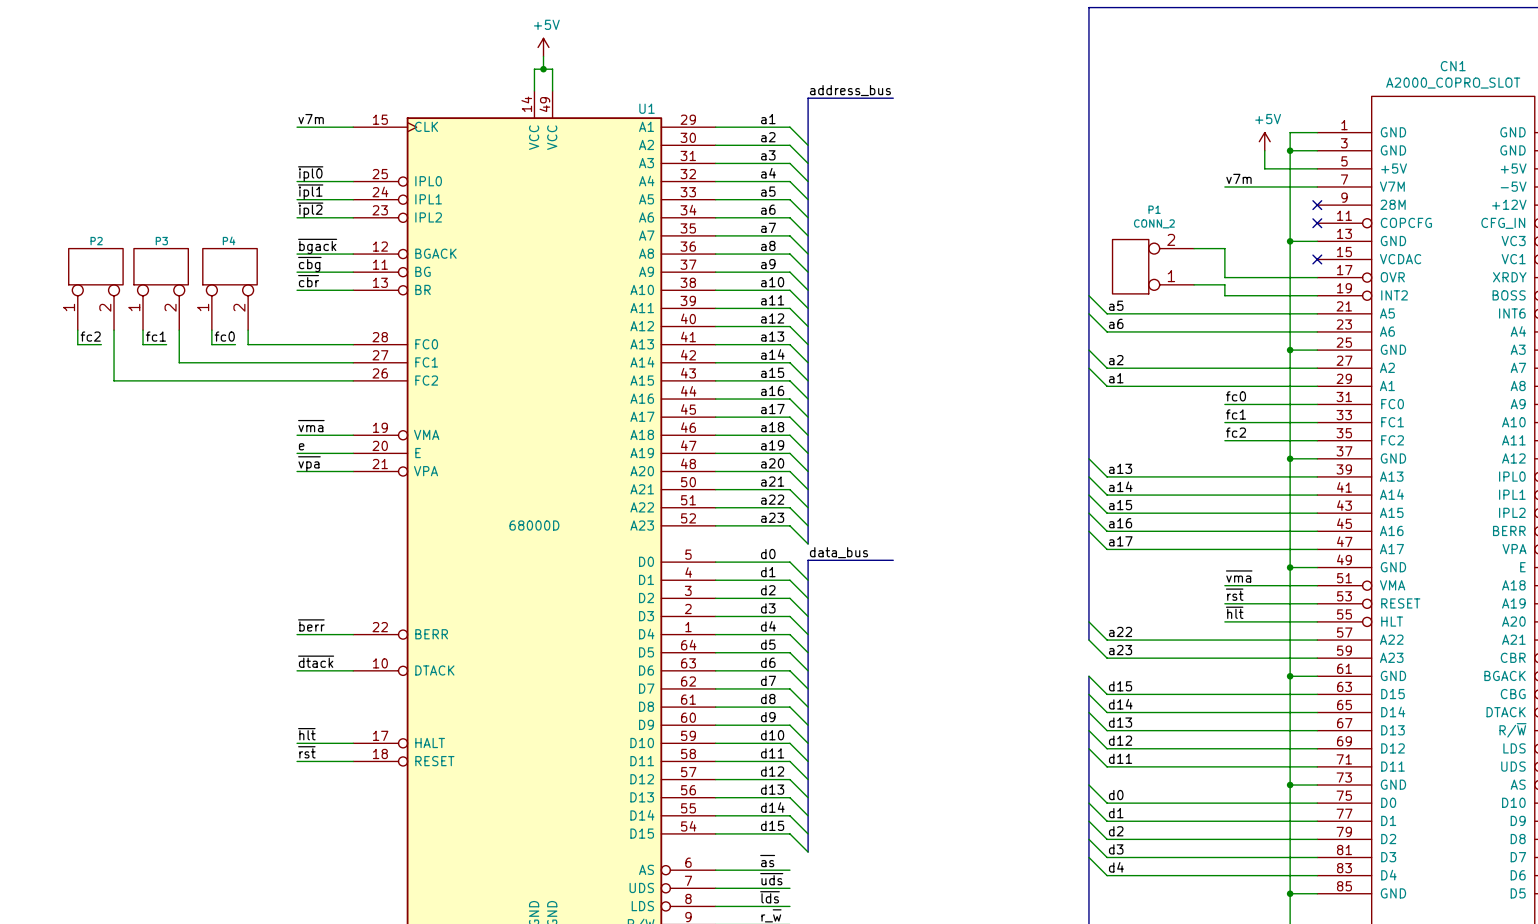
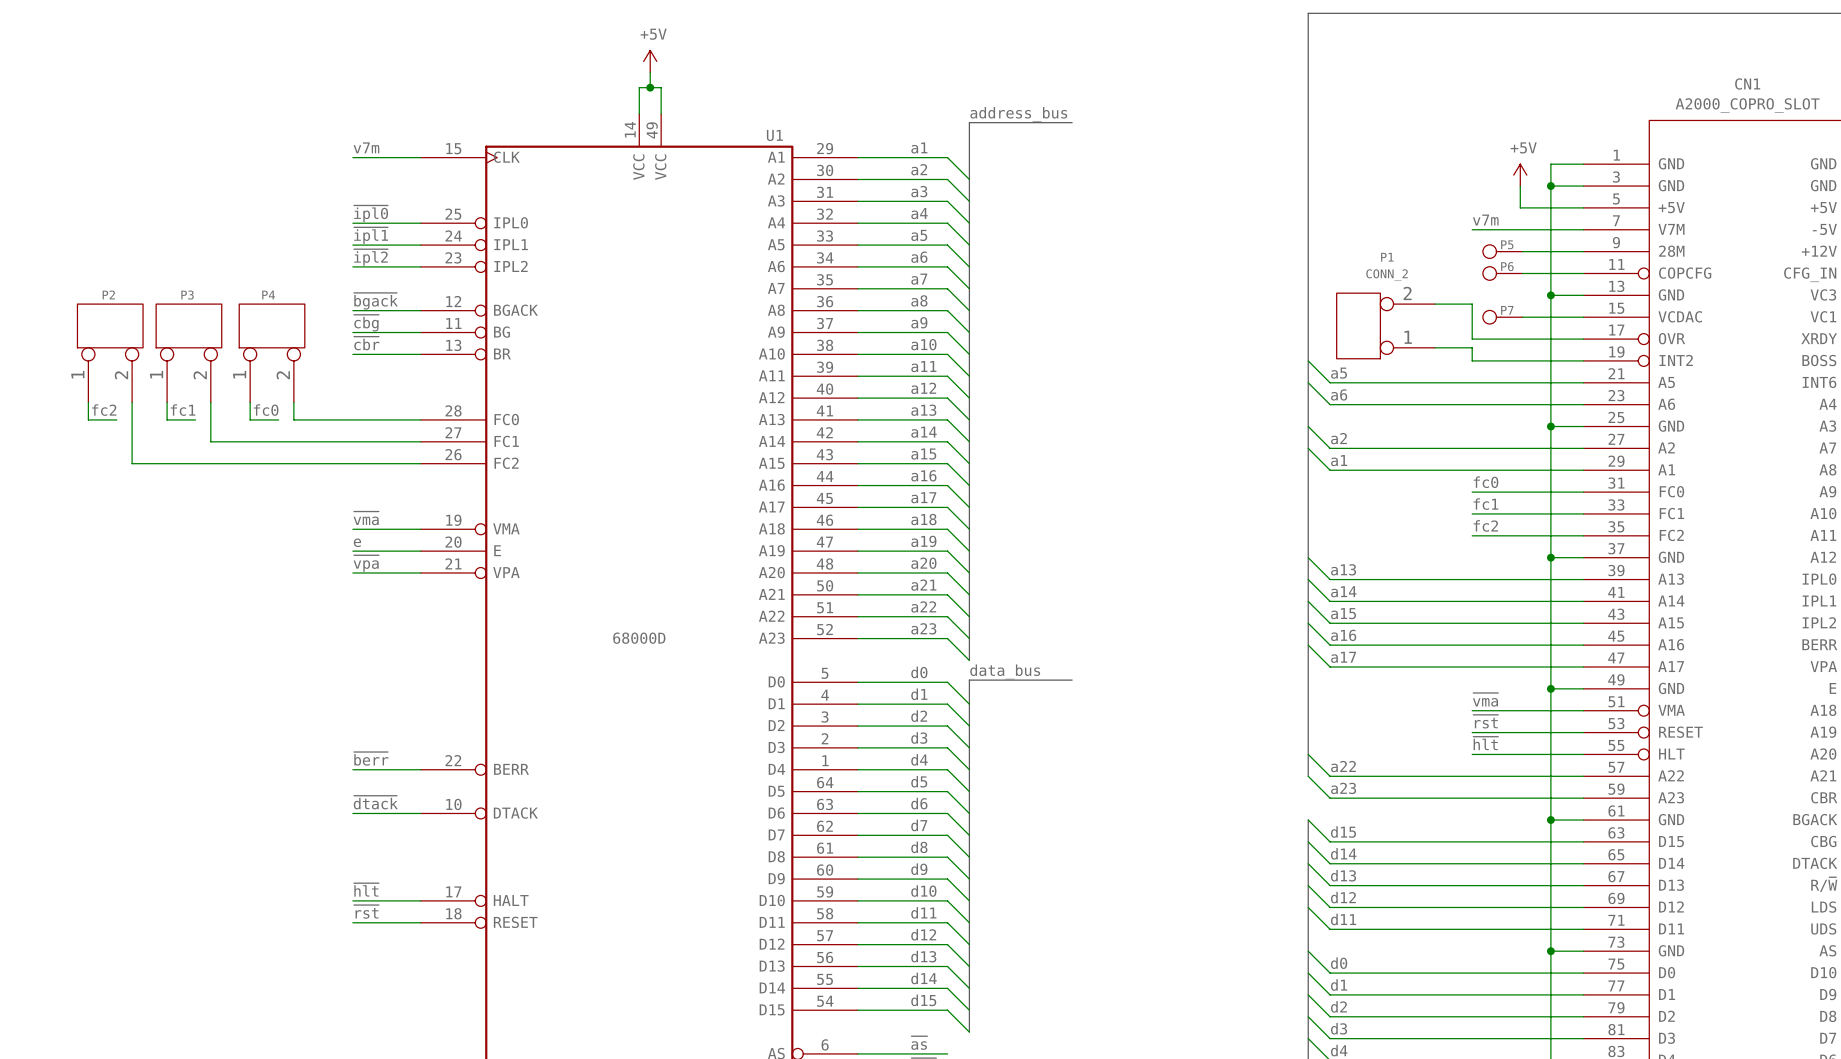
P5: none -> (1502, 251)
wire: none -> (1522, 251) (1583, 251)
no-connect mark: (1317, 205) -> none
P6: none -> (1502, 273)
wire: none -> (1522, 273) (1583, 273)
no-connect mark: (1317, 223) -> none
P7: none -> (1502, 317)
wire: none -> (1522, 317) (1583, 317)
no-connect mark: (1317, 259) -> none

